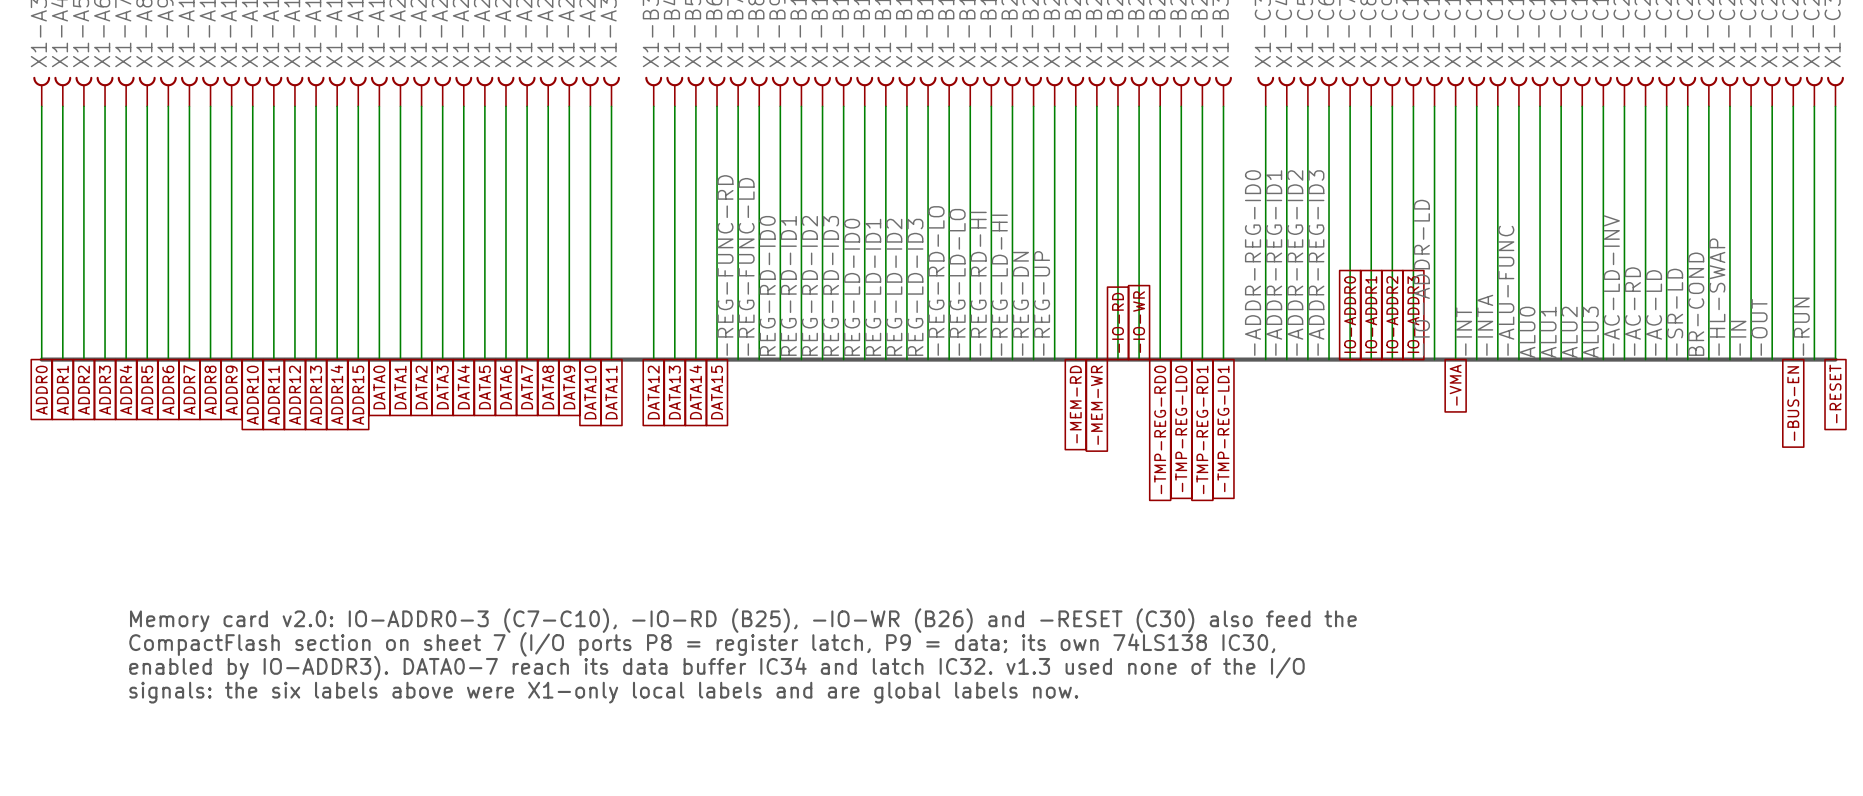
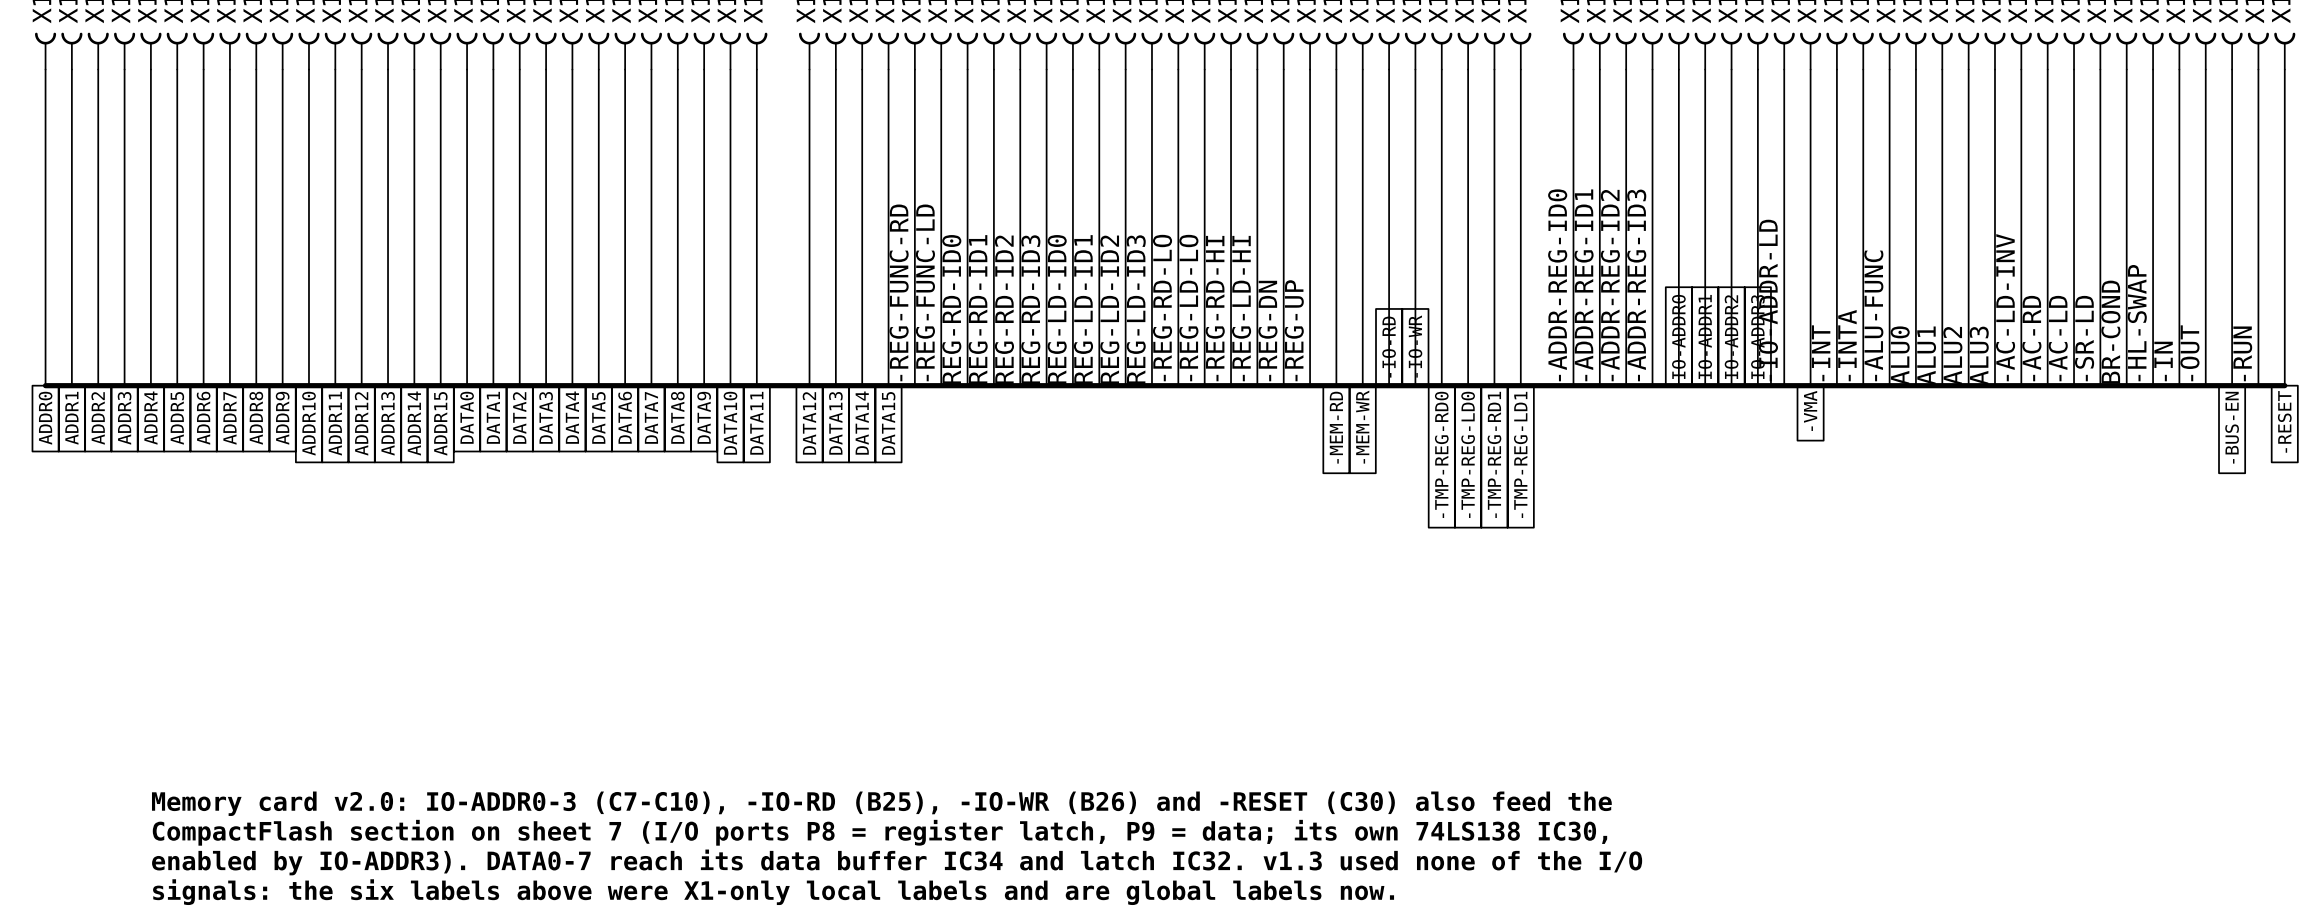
text position: Memory card v2.0: IO-ADDR0-3 (C7-C10), -IO-RD (B25), -IO-WR (B26) and -RESET (C30) also feed the (743, 620) -> Memory card v2.0: IO-ADDR0-3 (C7-C10), -IO-RD (B25), -IO-WR (B26) and -RESET (C30) also feed the (881, 803)
text position: CompactFlash section on sheet 7 (I/O ports P8 = register latch, P9 = data; its own 74LS138 IC30, (702, 644) -> CompactFlash section on sheet 7 (I/O ports P8 = register latch, P9 = data; its own 74LS138 IC30, (879, 832)
text position: enabled by IO-ADDR3). DATA0-7 reach its data buffer IC34 and latch IC32. v1.3 used none of the I/O (717, 668) -> enabled by IO-ADDR3). DATA0-7 reach its data buffer IC34 and latch IC32. v1.3 used none of the I/O (897, 862)
text position: signals: the six labels above were X1-only local labels and are global labels now. (603, 692) -> signals: the six labels above were X1-only local labels and are global labels now. (773, 892)

